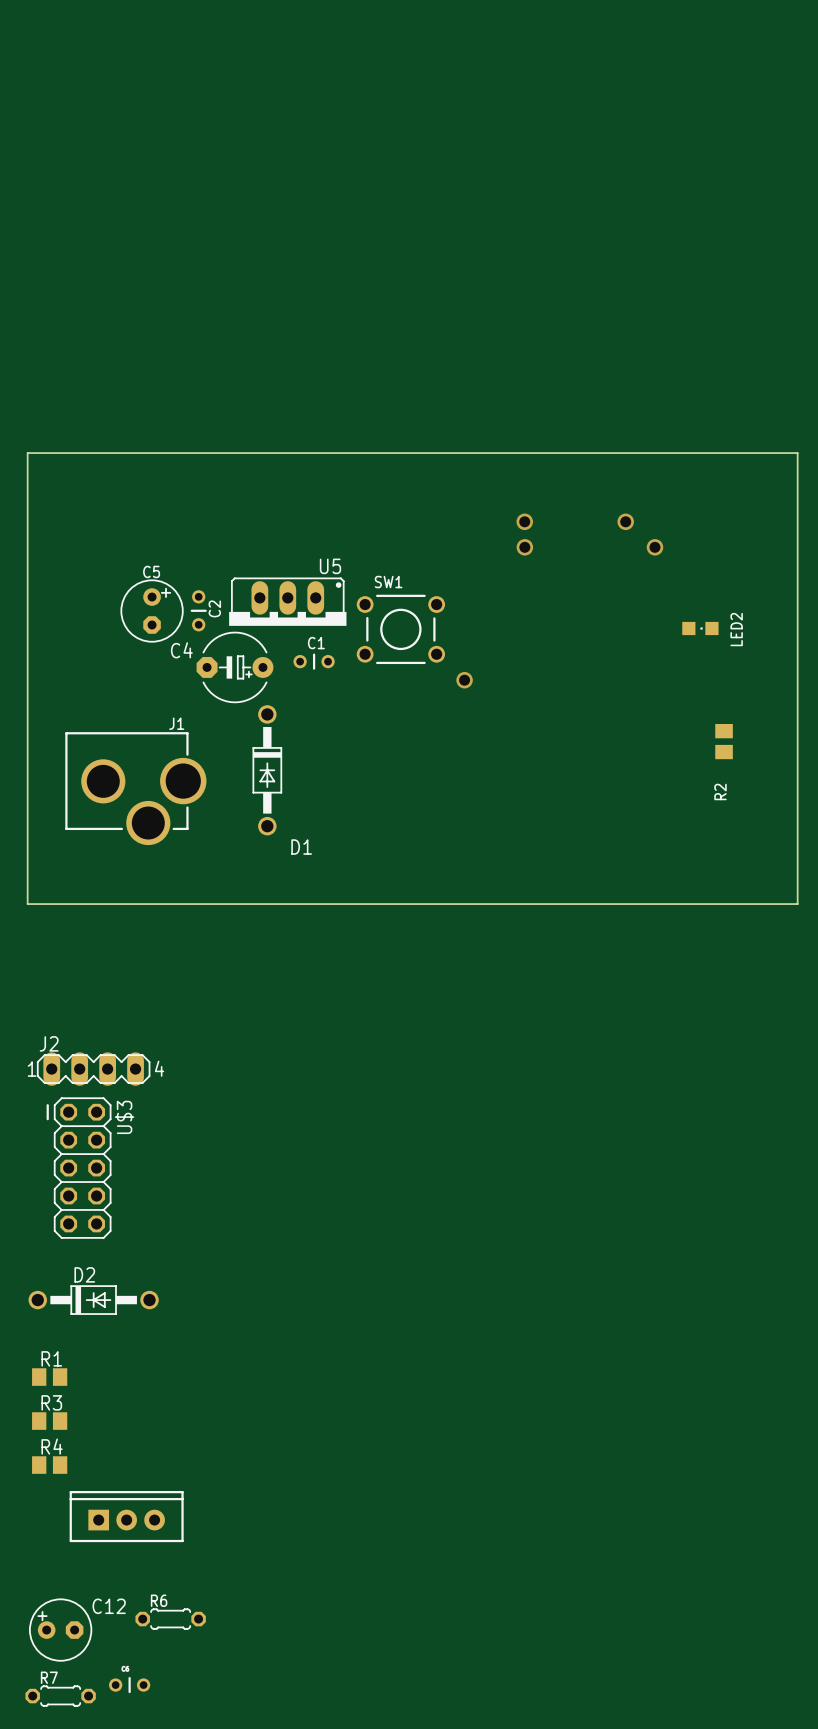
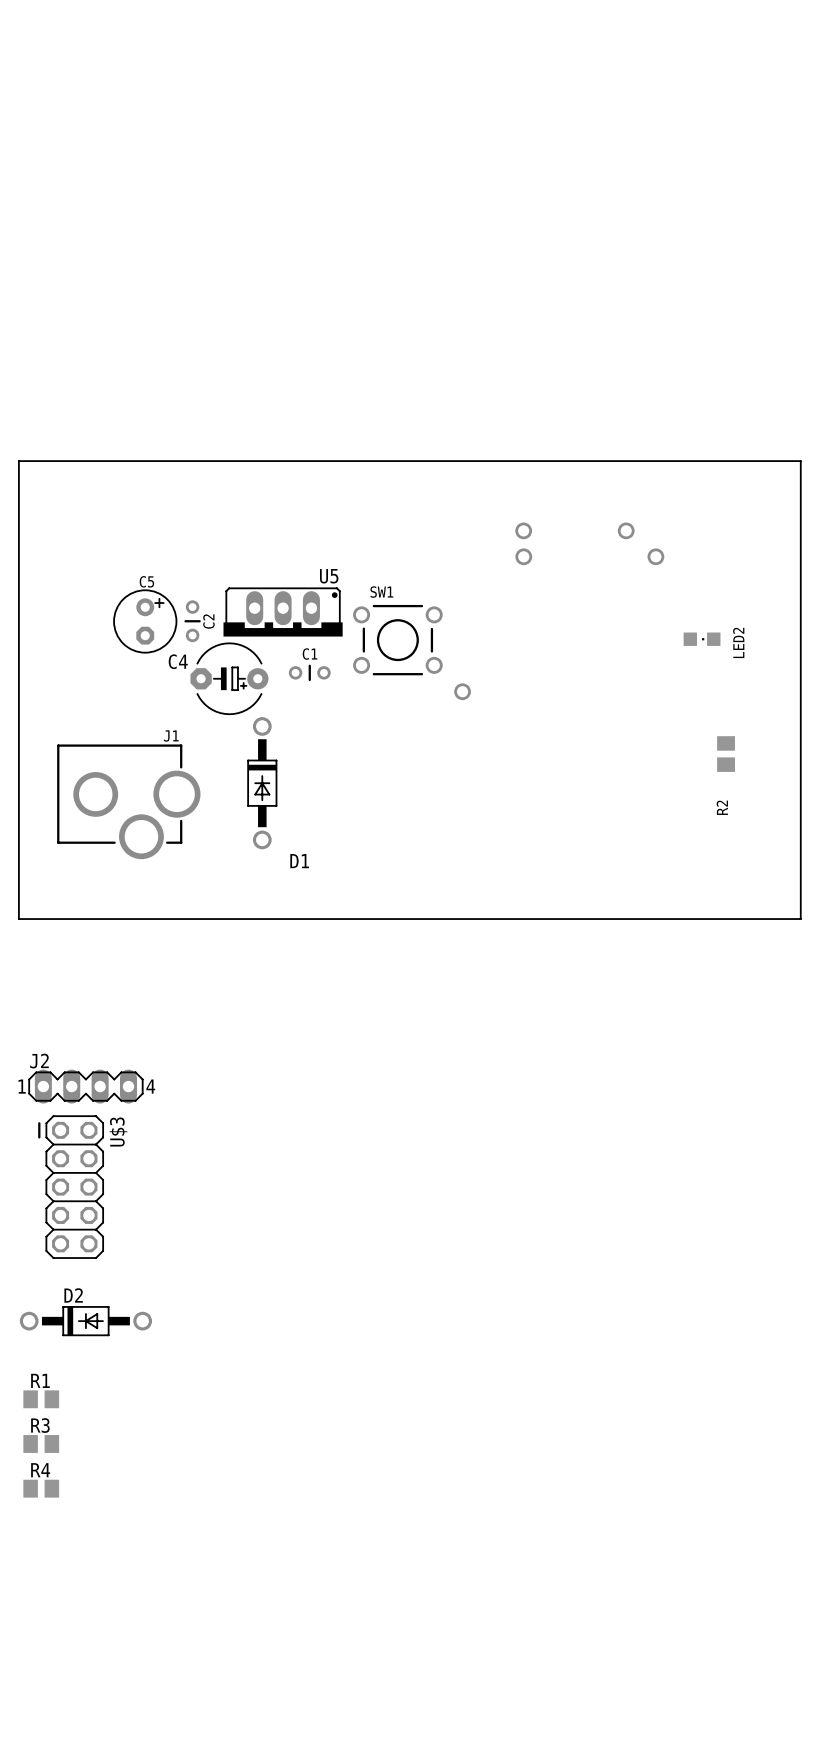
part: (126, 1516) -> none
R6: (170, 1619) -> none
C12: (60, 1630) -> none
part: (129, 1685) -> none
R7: (60, 1696) -> none

